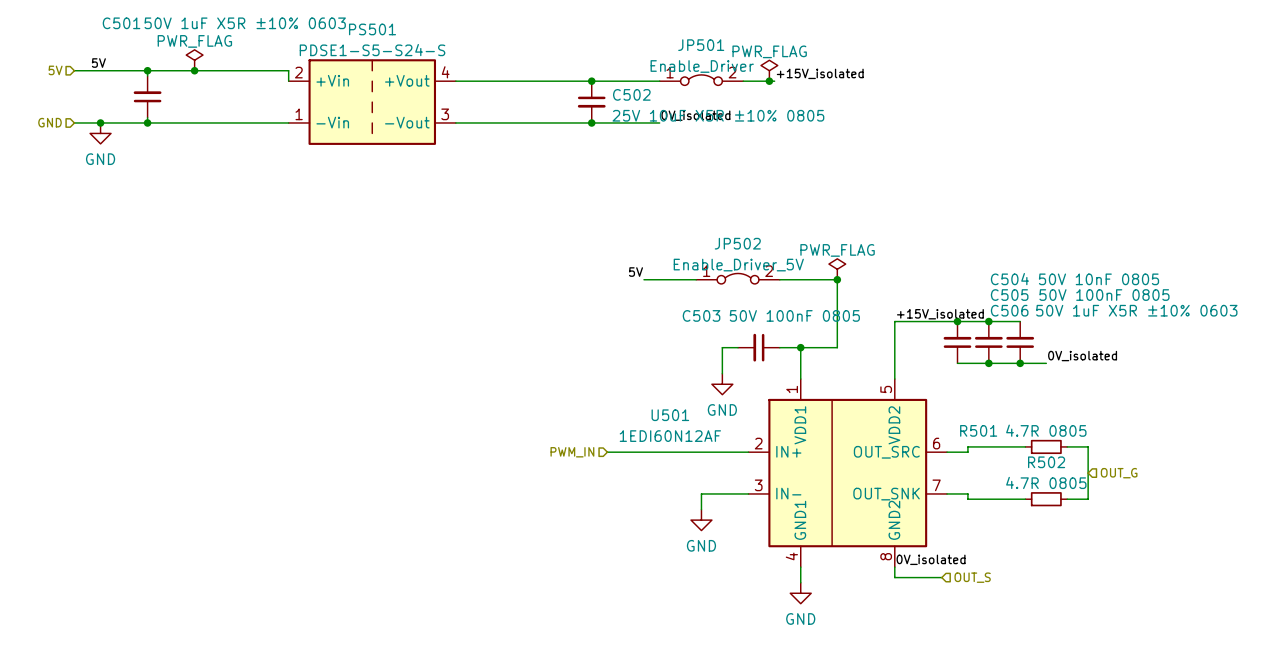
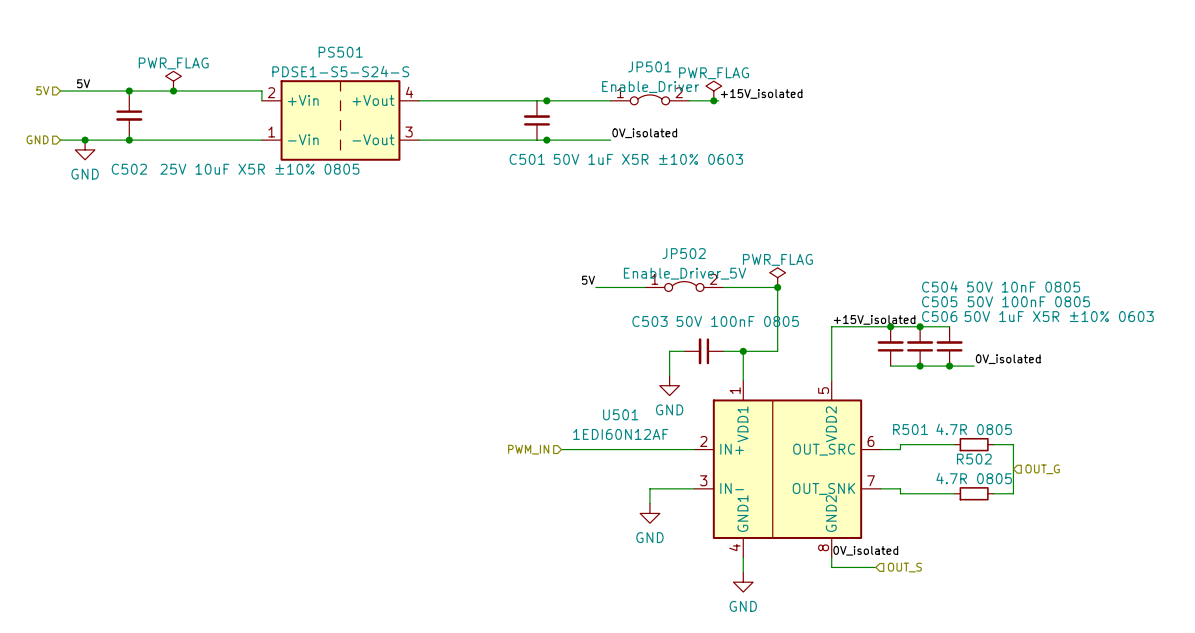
C501 name position: C501 (121, 23) -> C501 (527, 159)
C501 value position: 50V 1uF X5R ±10% 0603 (245, 23) -> 50V 1uF X5R ±10% 0603 (648, 159)
C502 name position: C502 (631, 94) -> C502 (129, 169)
C501 position: (147, 96) -> (536, 120)
C502 position: (591, 102) -> (129, 115)
C502 value position: 25V 10uF X5R ±10% 0805 (718, 115) -> 25V 10uF X5R ±10% 0805 (259, 169)

